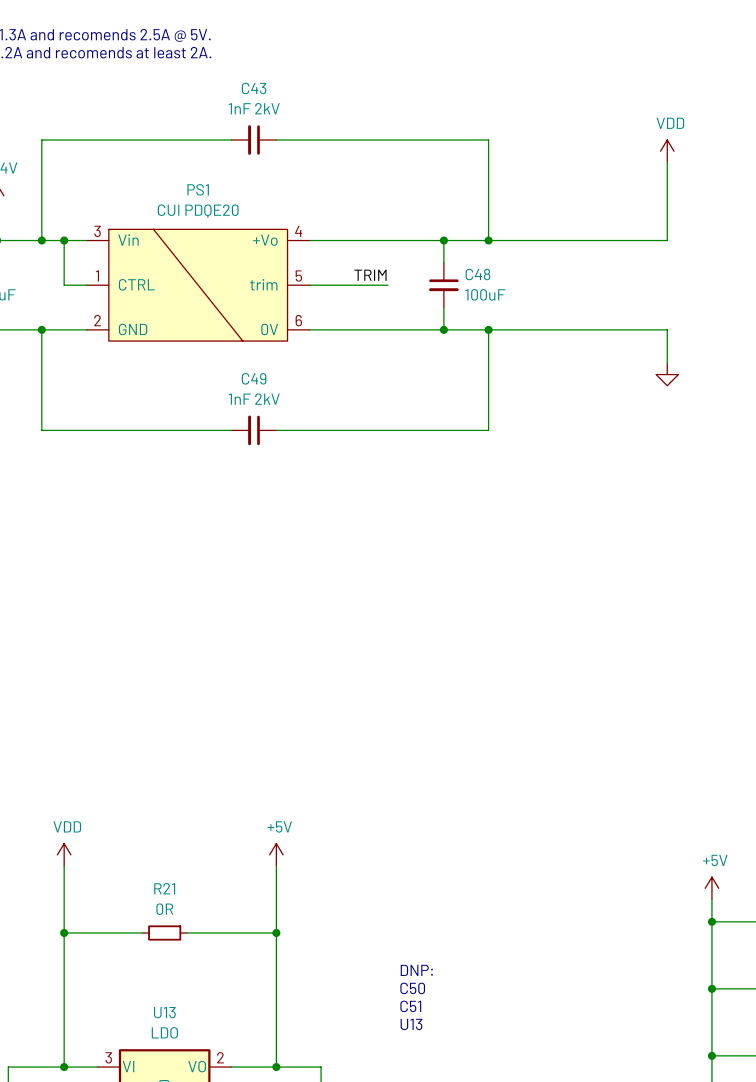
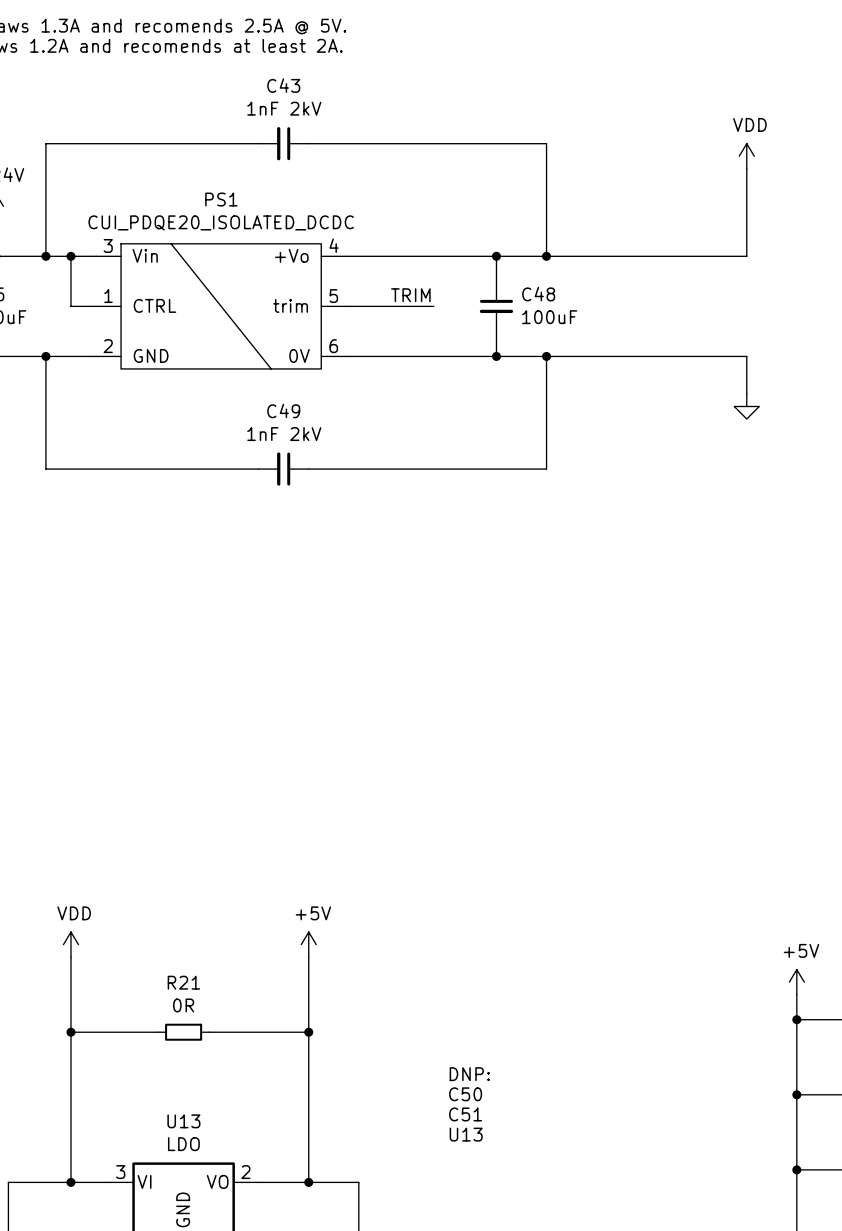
PS1 value: CUI PDQE20 (198, 211) -> CUI_PDQE20_ISOLATED_DCDC (221, 222)

